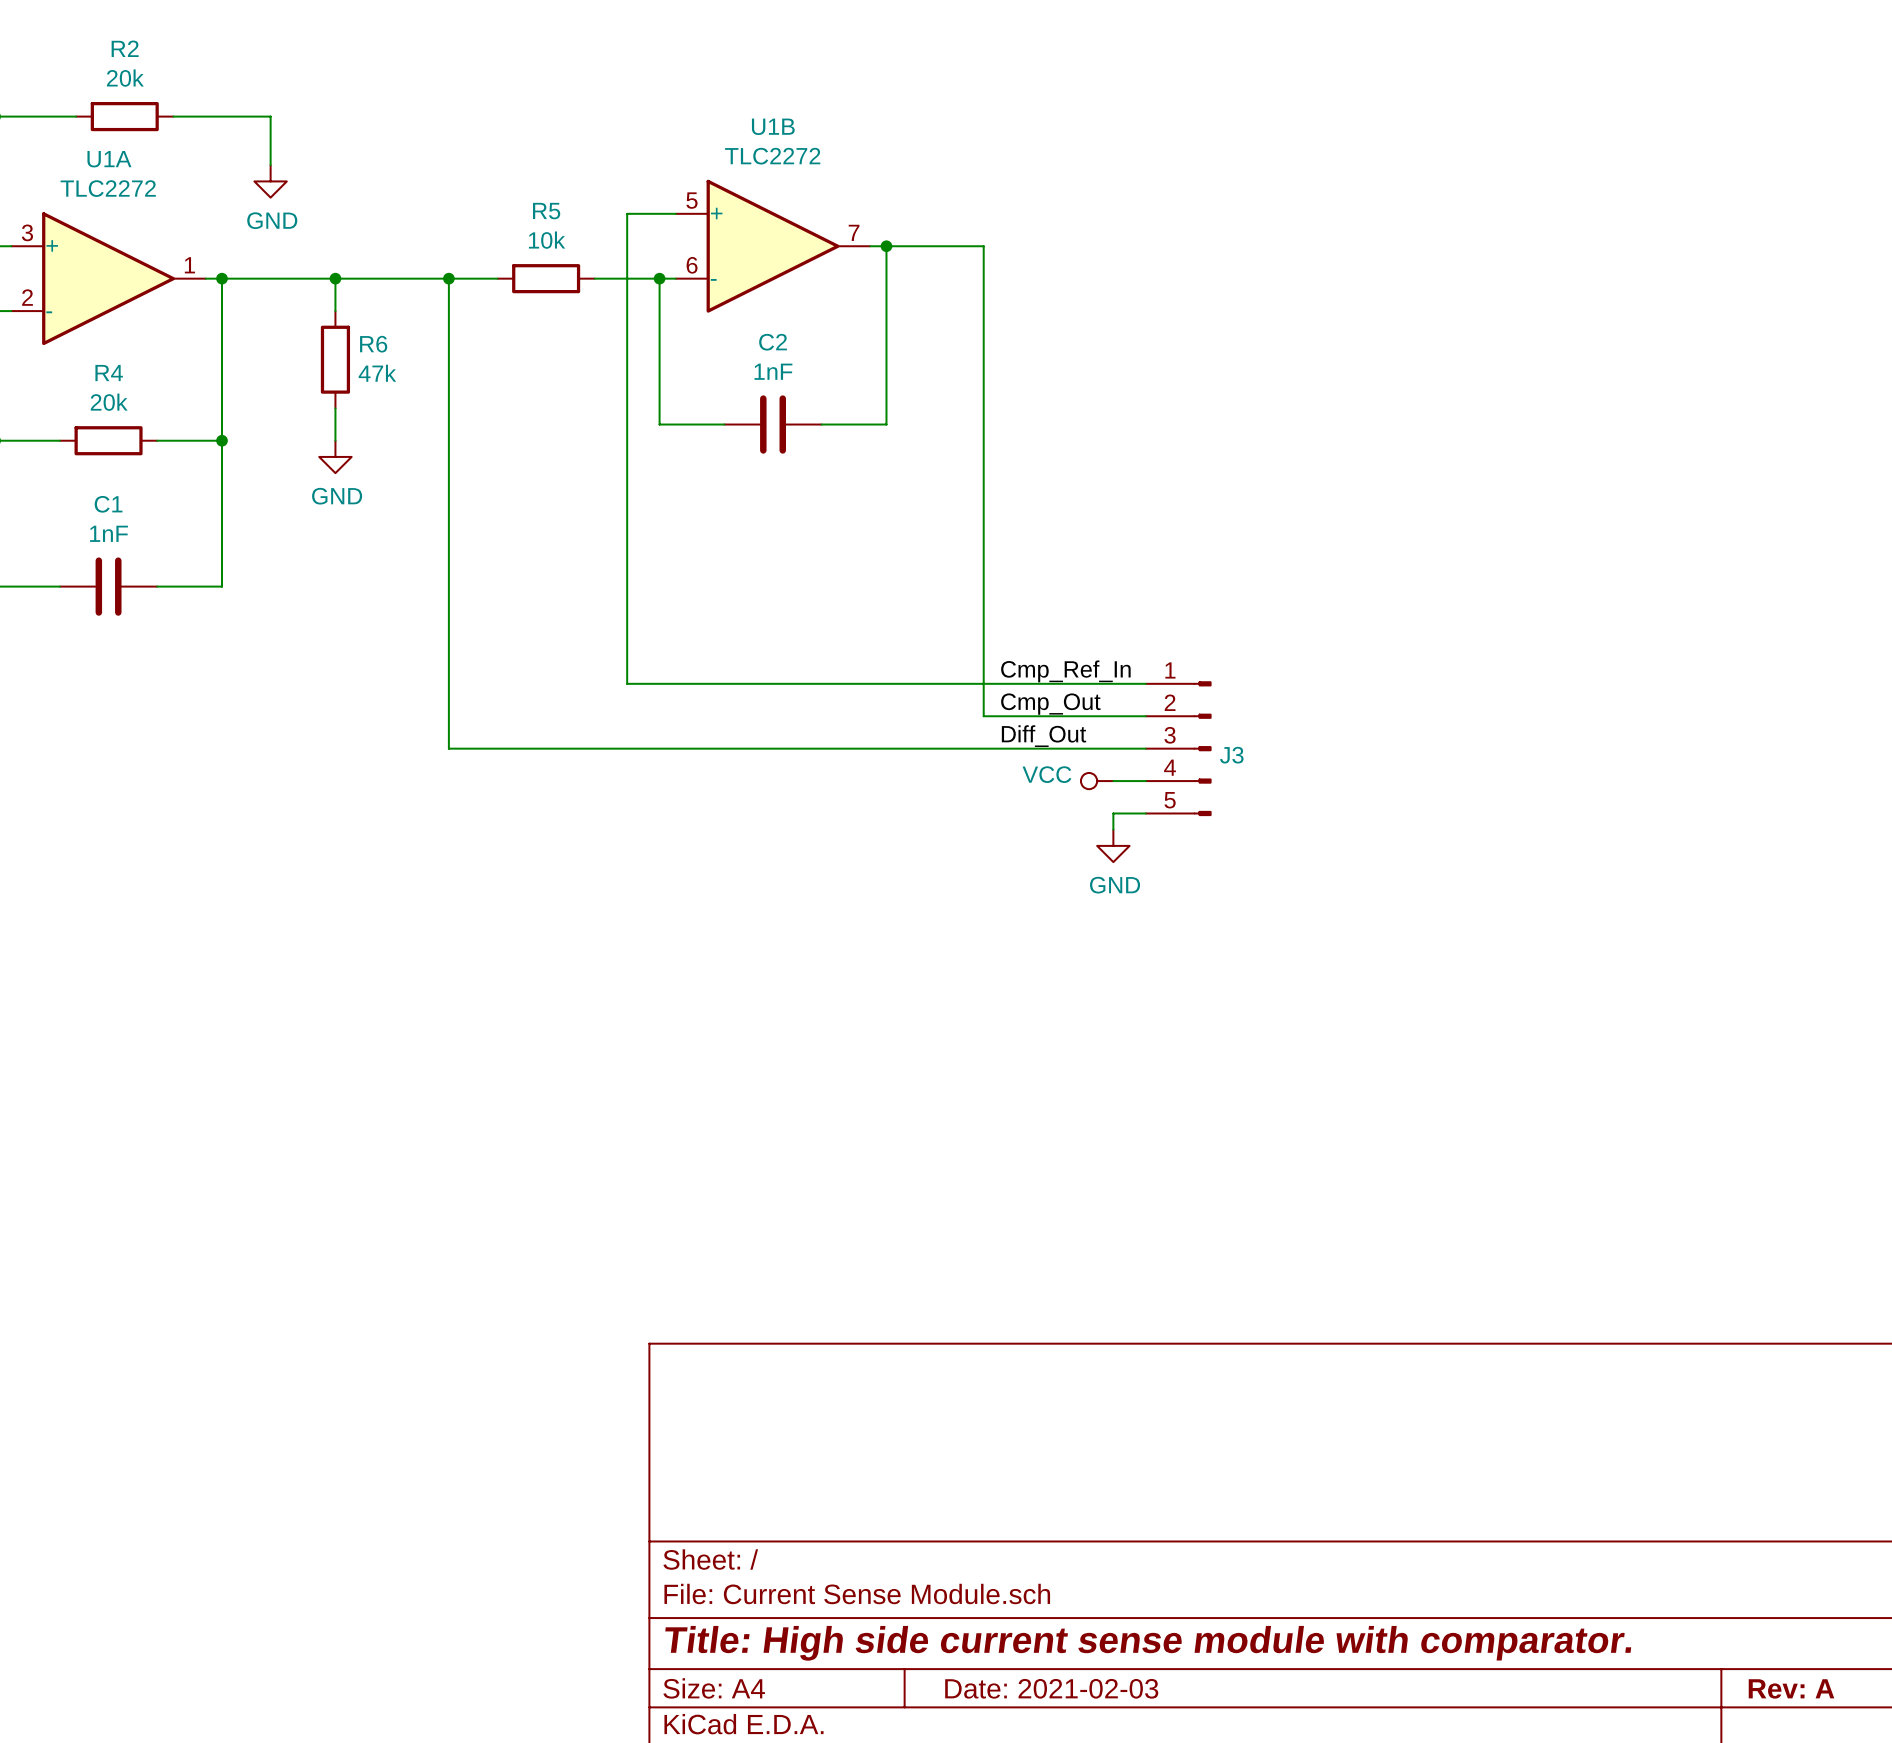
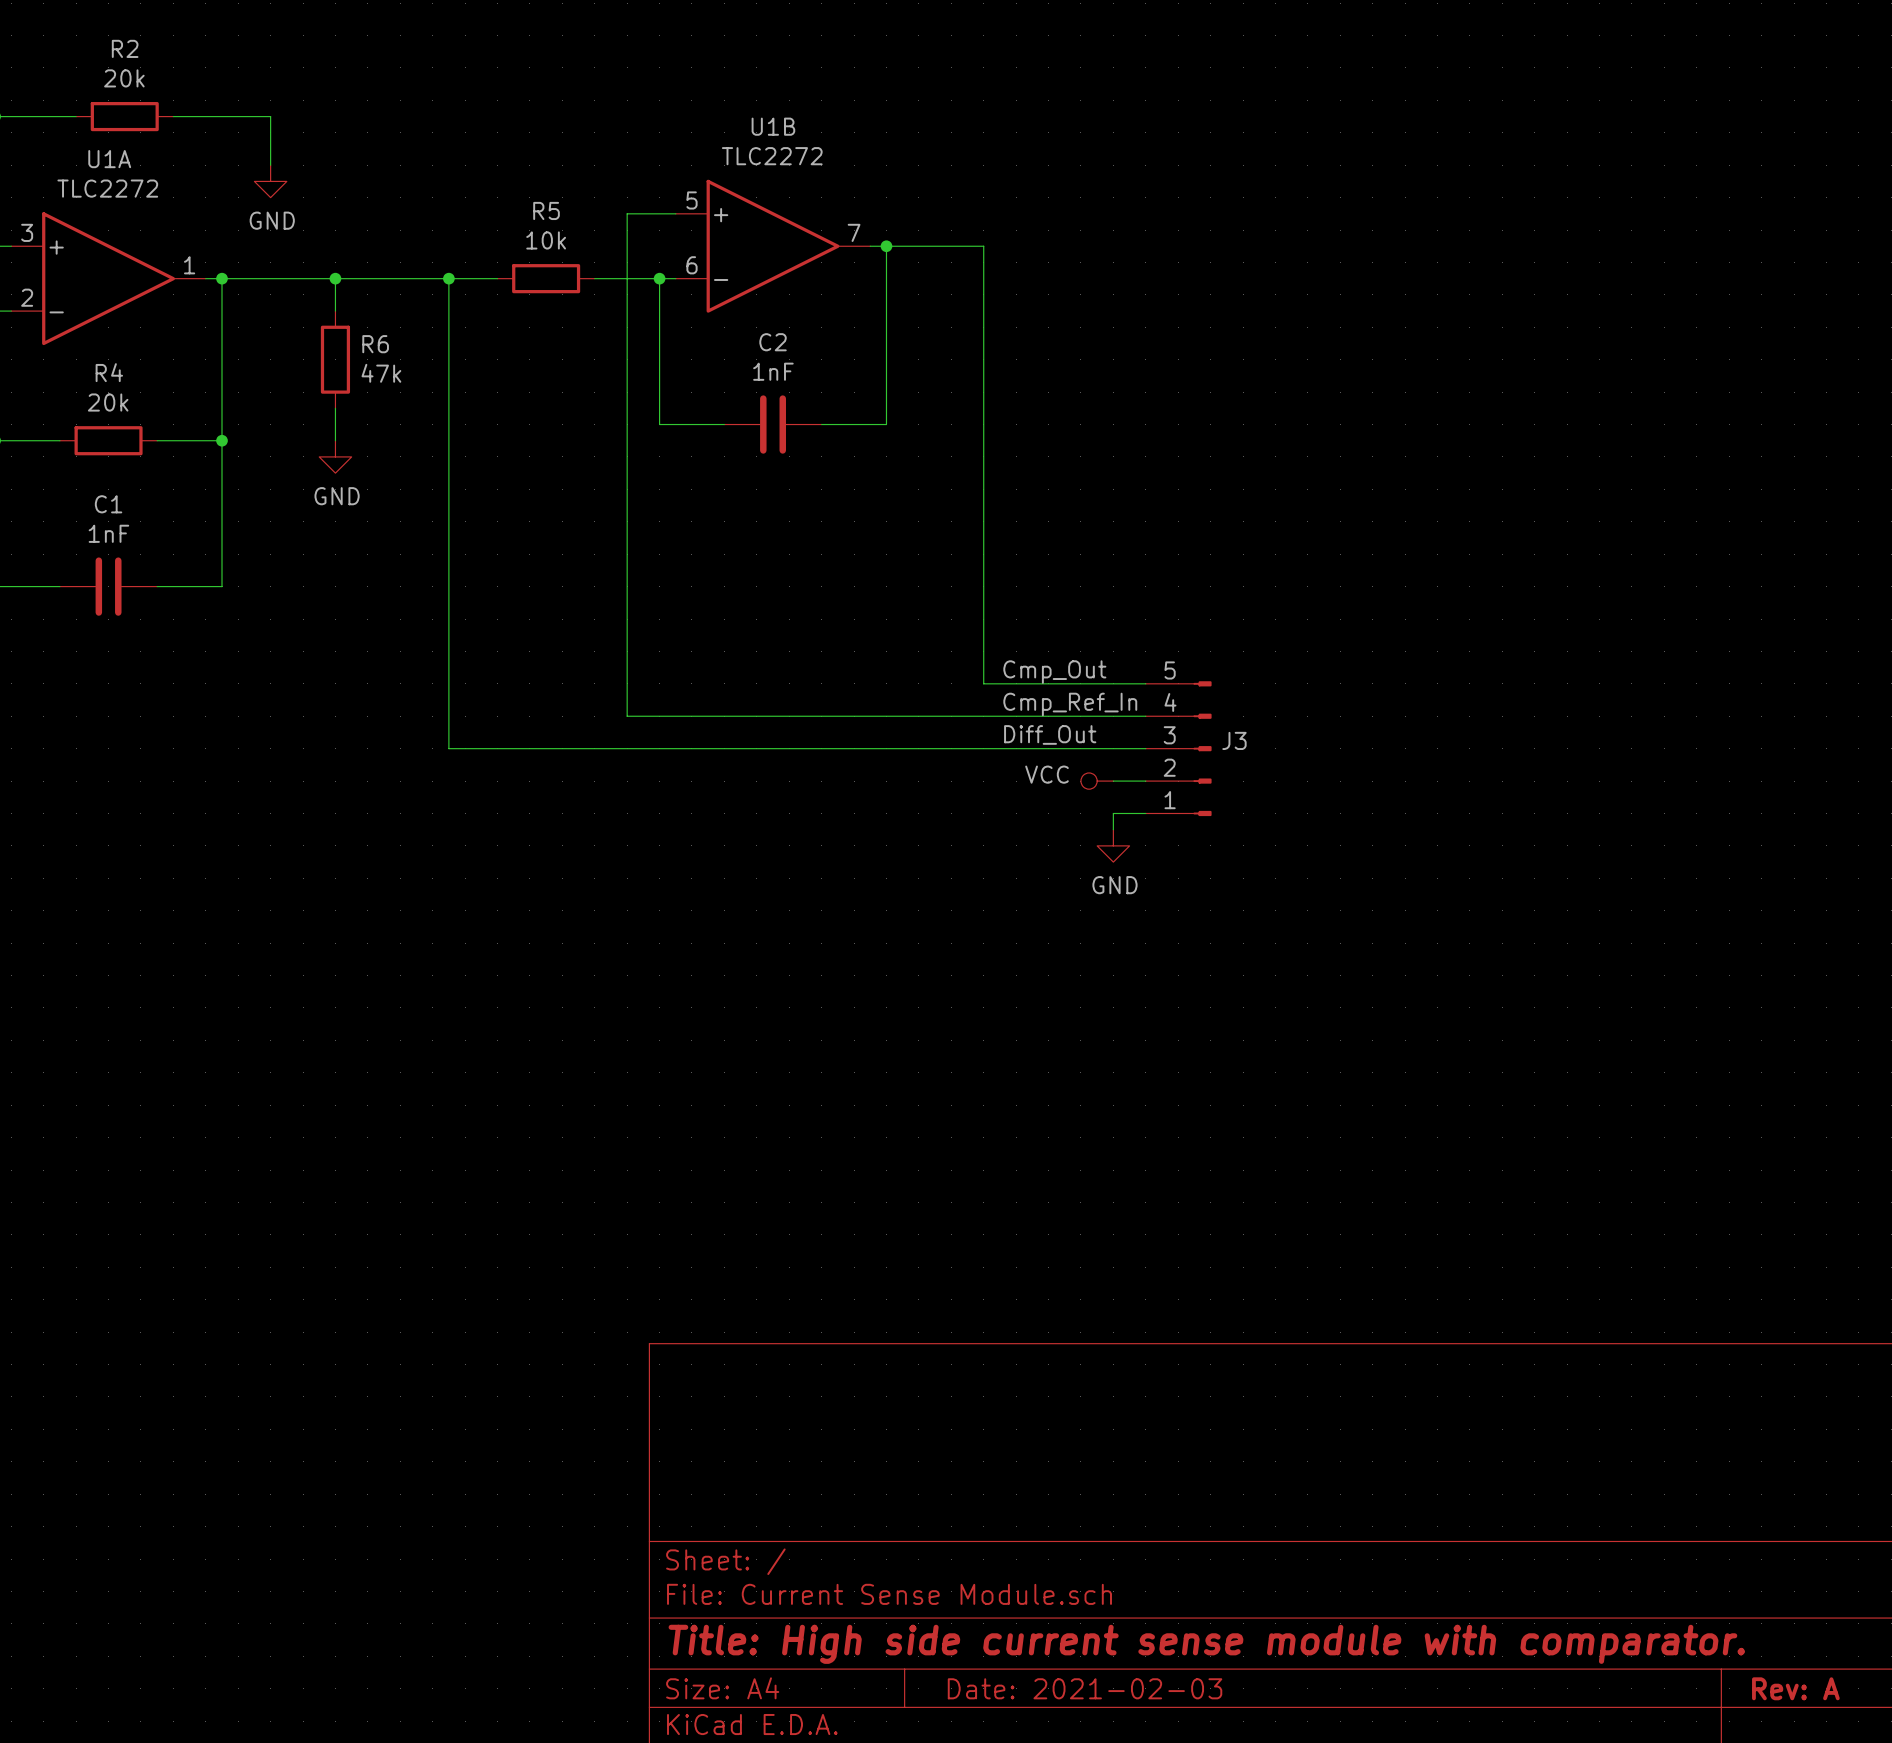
label: Cmp_Ref_In (1065, 671) -> Cmp_Out (1054, 672)
wire: (627, 683) (983, 683) (983, 716) -> (627, 683) (627, 716) (983, 716)
label: Cmp_Out (1050, 704) -> Cmp_Ref_In (1070, 704)
J3 flip: as is (1202, 748) -> up-down (1202, 748)

